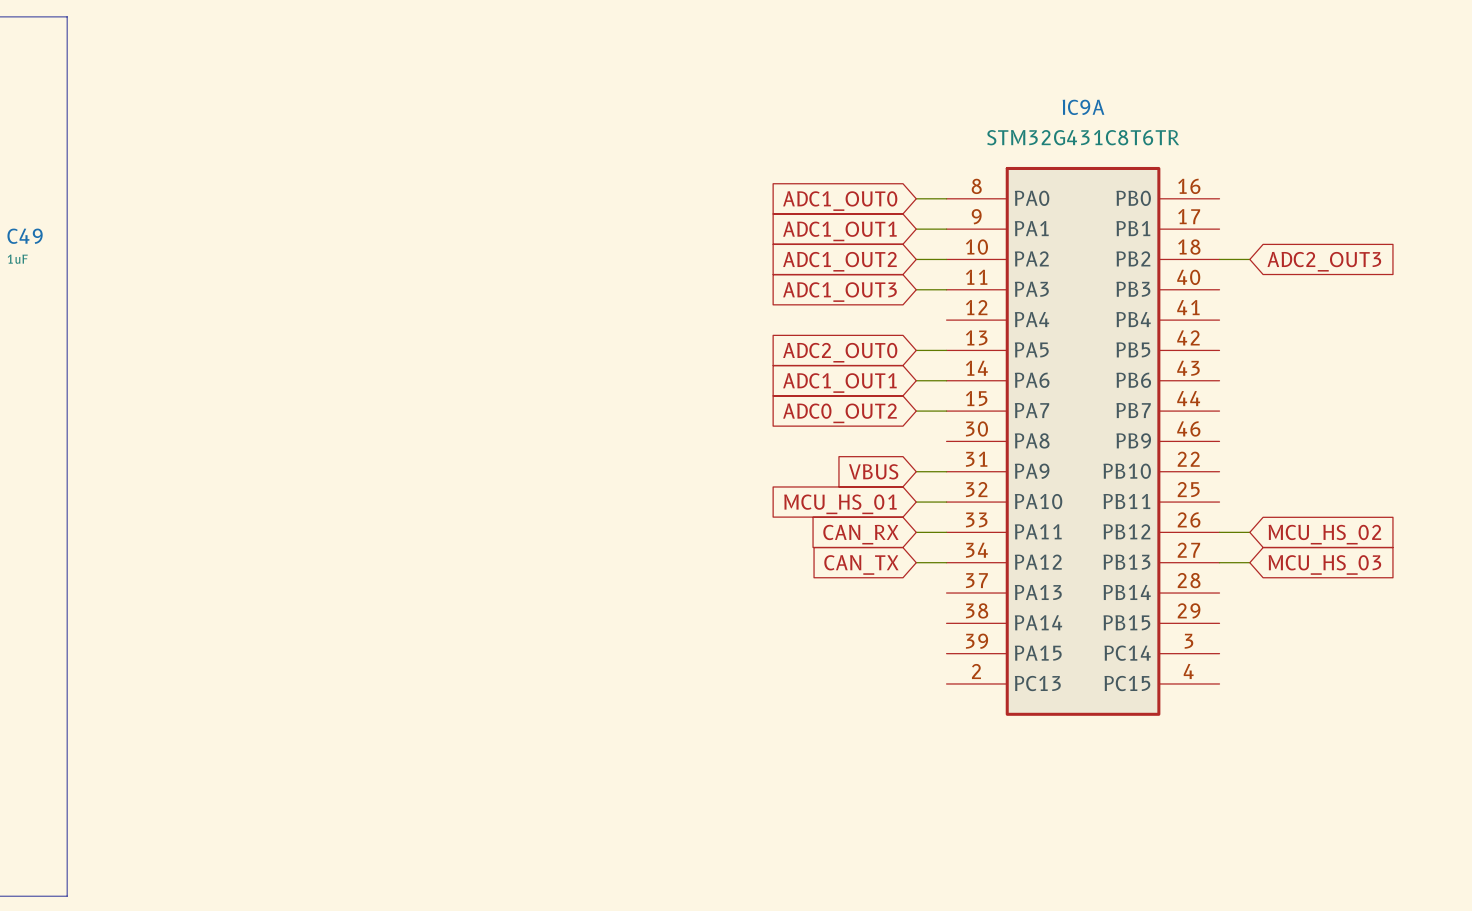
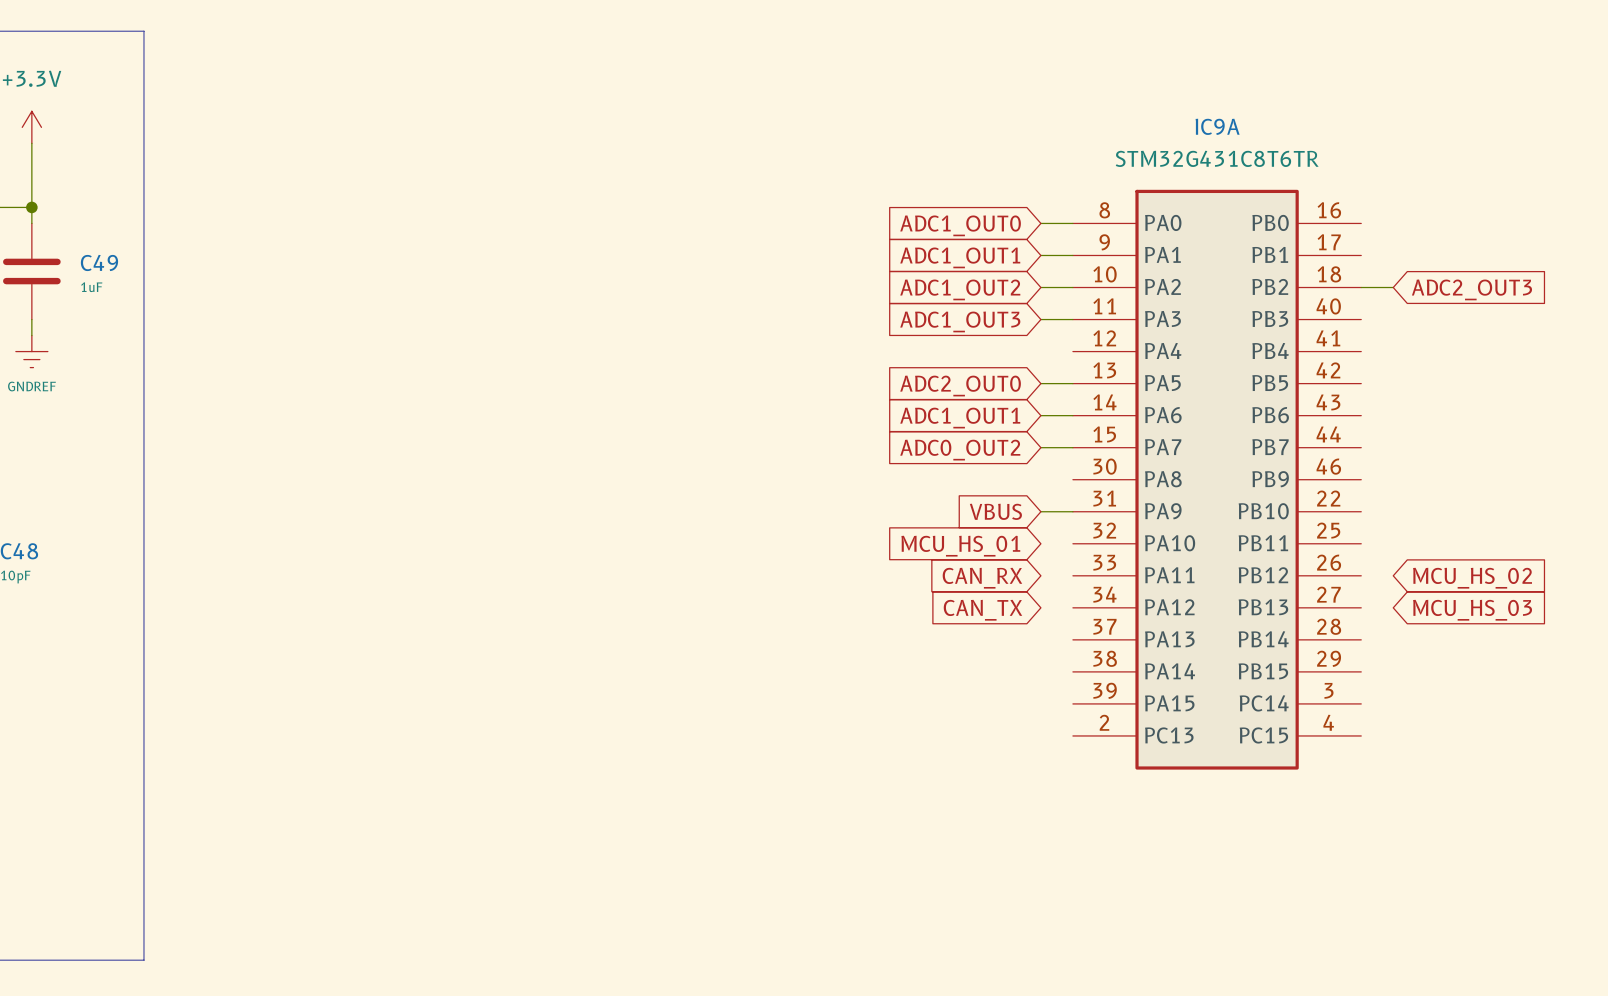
wire: (916, 502) (946, 502) -> none
wire: (916, 532) (946, 532) -> none
wire: (1219, 532) (1249, 532) -> none
wire: (916, 562) (946, 562) -> none
wire: (1219, 562) (1249, 562) -> none

